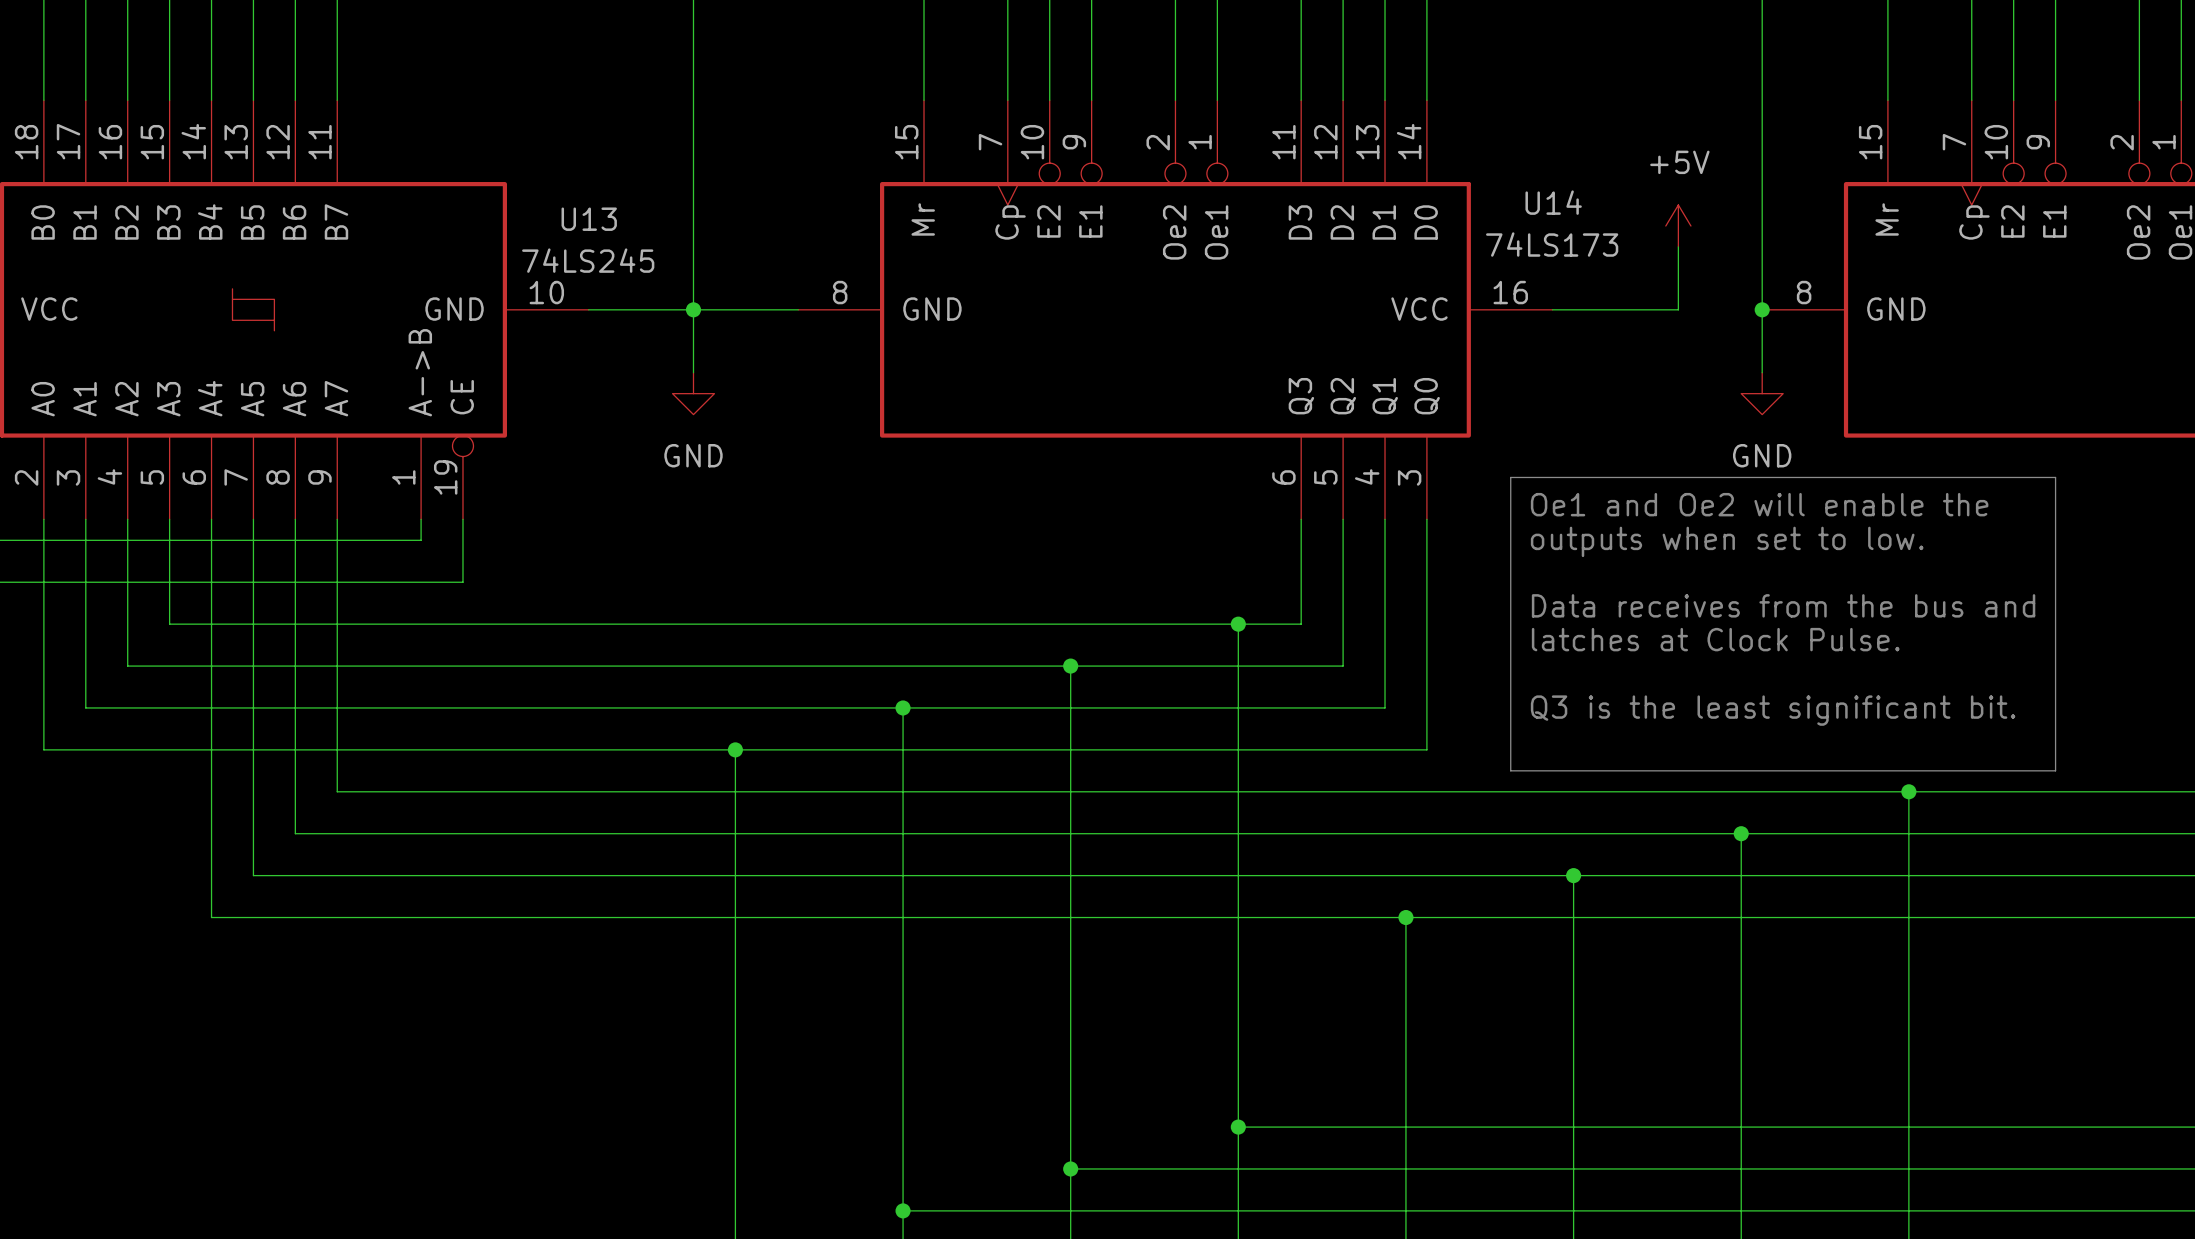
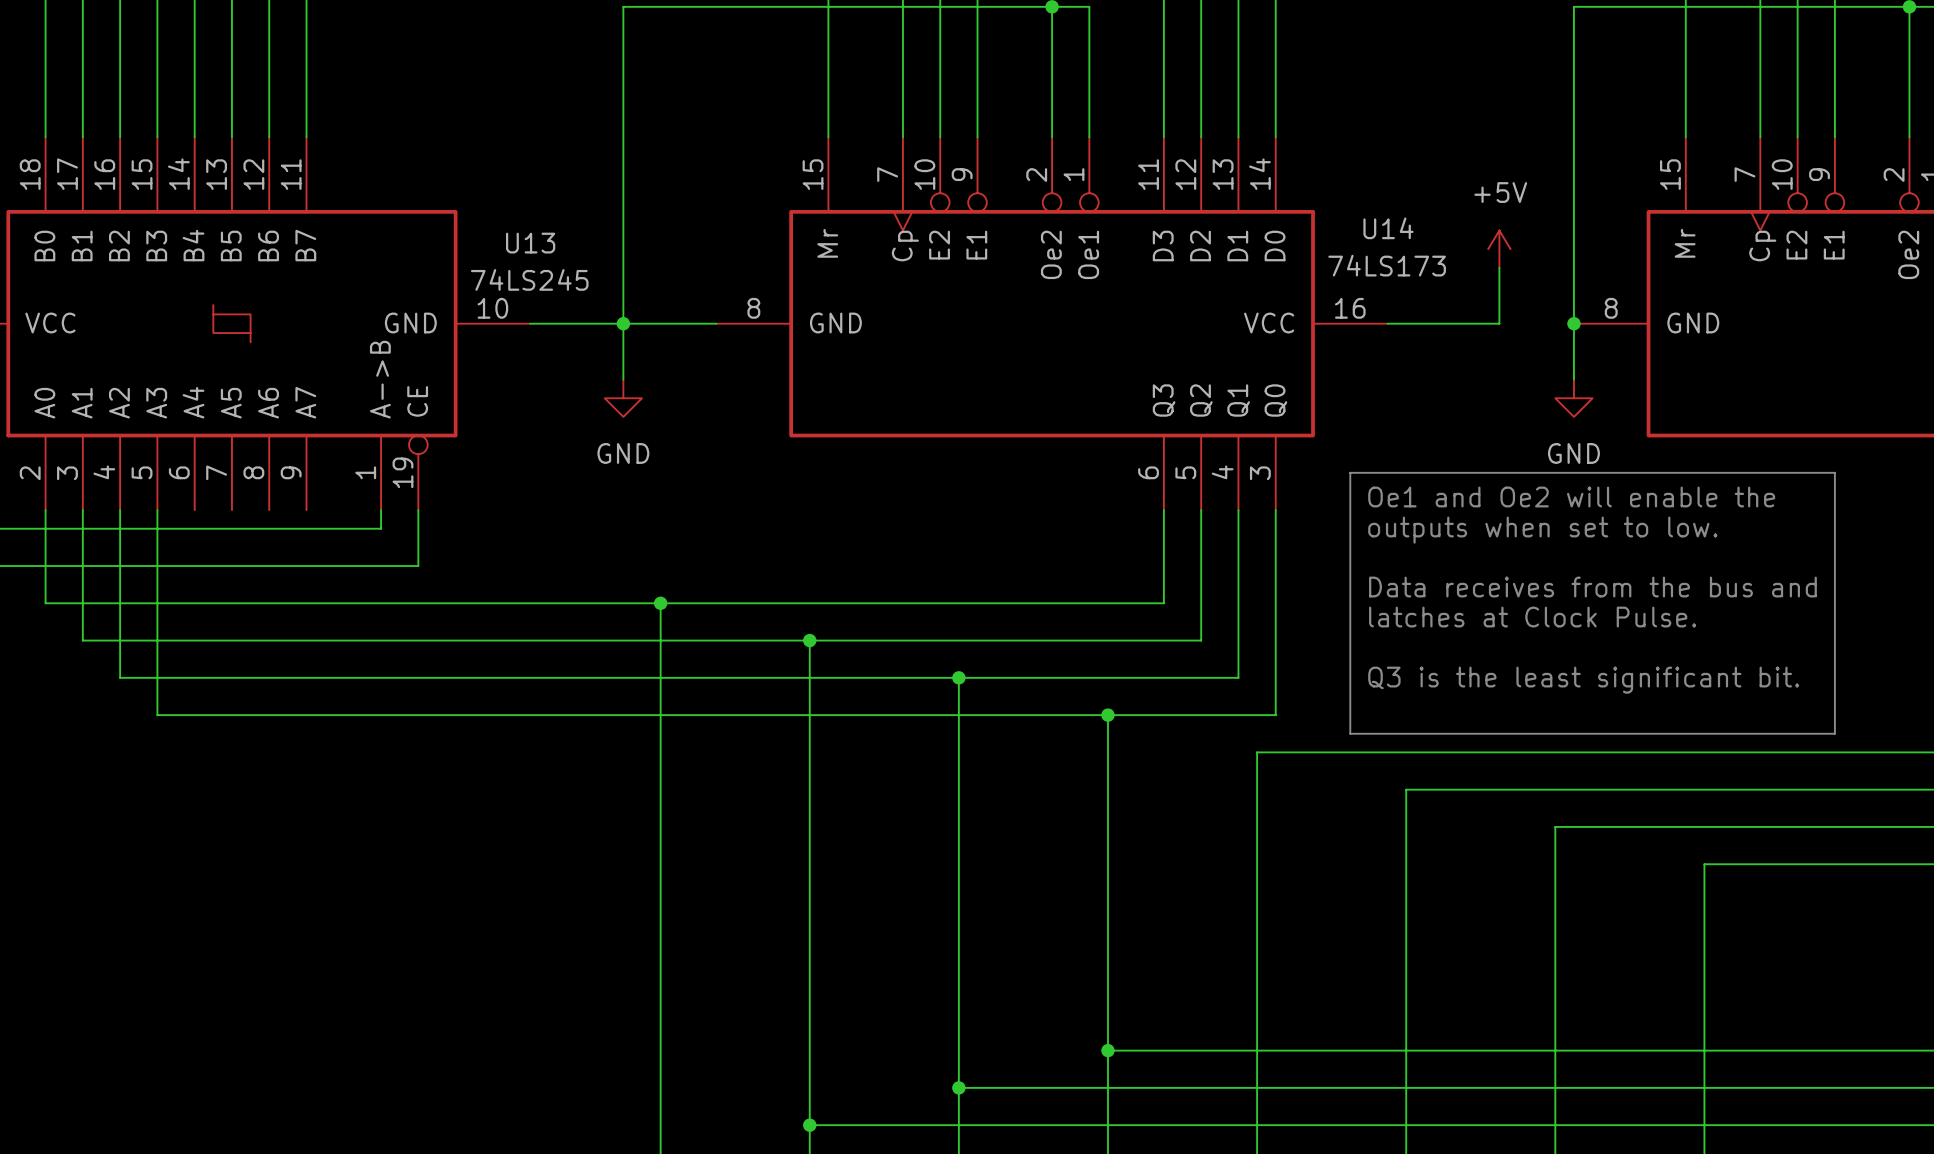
wire: (211, 519) (211, 917) (1908, 917) (1908, 791) -> none
wire: (253, 519) (253, 875) (1741, 875) (1741, 833) -> none
wire: (295, 519) (295, 833) (1573, 833) -> (1406, 826) (1406, 789)
wire: (337, 519) (337, 791) (1405, 791) -> (1257, 864) (1257, 752)
wire: (43, 624) (43, 749) (169, 749) -> (45, 603) (157, 603) (157, 715)
wire: none -> (660, 603) (660, 715)
junction: none -> (660, 603)
wire: (1238, 624) (1238, 749) -> none
junction: (1238, 624) -> none
wire: (85, 666) (85, 707) (127, 707) -> (82, 640) (120, 640) (120, 677)
wire: (1070, 666) (1070, 707) -> (809, 640) (809, 677)
junction position: (1070, 666) -> (958, 677)
junction position: (903, 707) -> (809, 640)
junction: (735, 749) -> none
junction: none -> (1107, 715)
junction: (1908, 791) -> none
junction: (1741, 833) -> none
junction: (1573, 875) -> none
junction: (1405, 917) -> none

